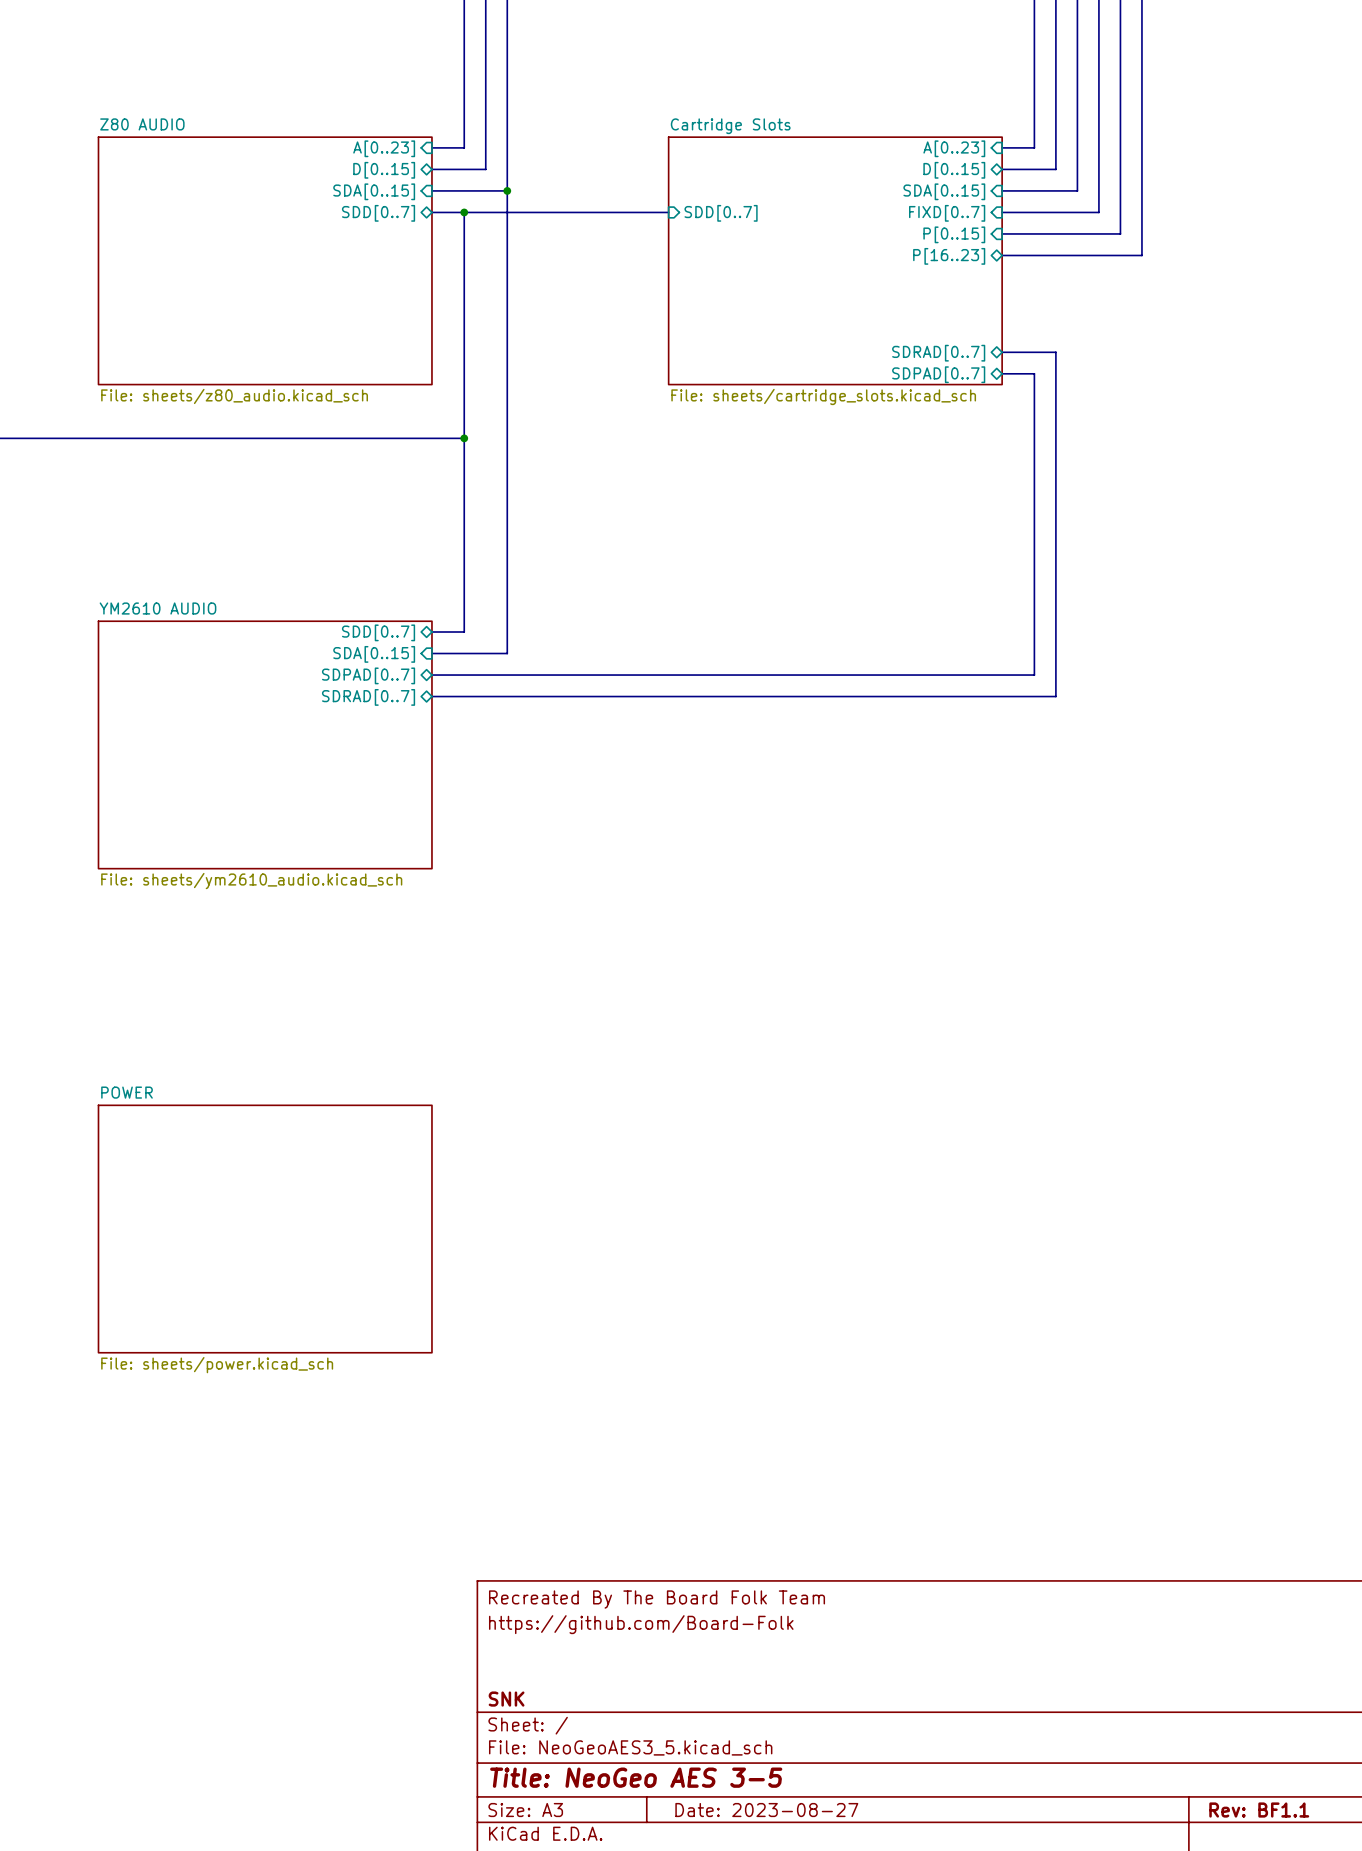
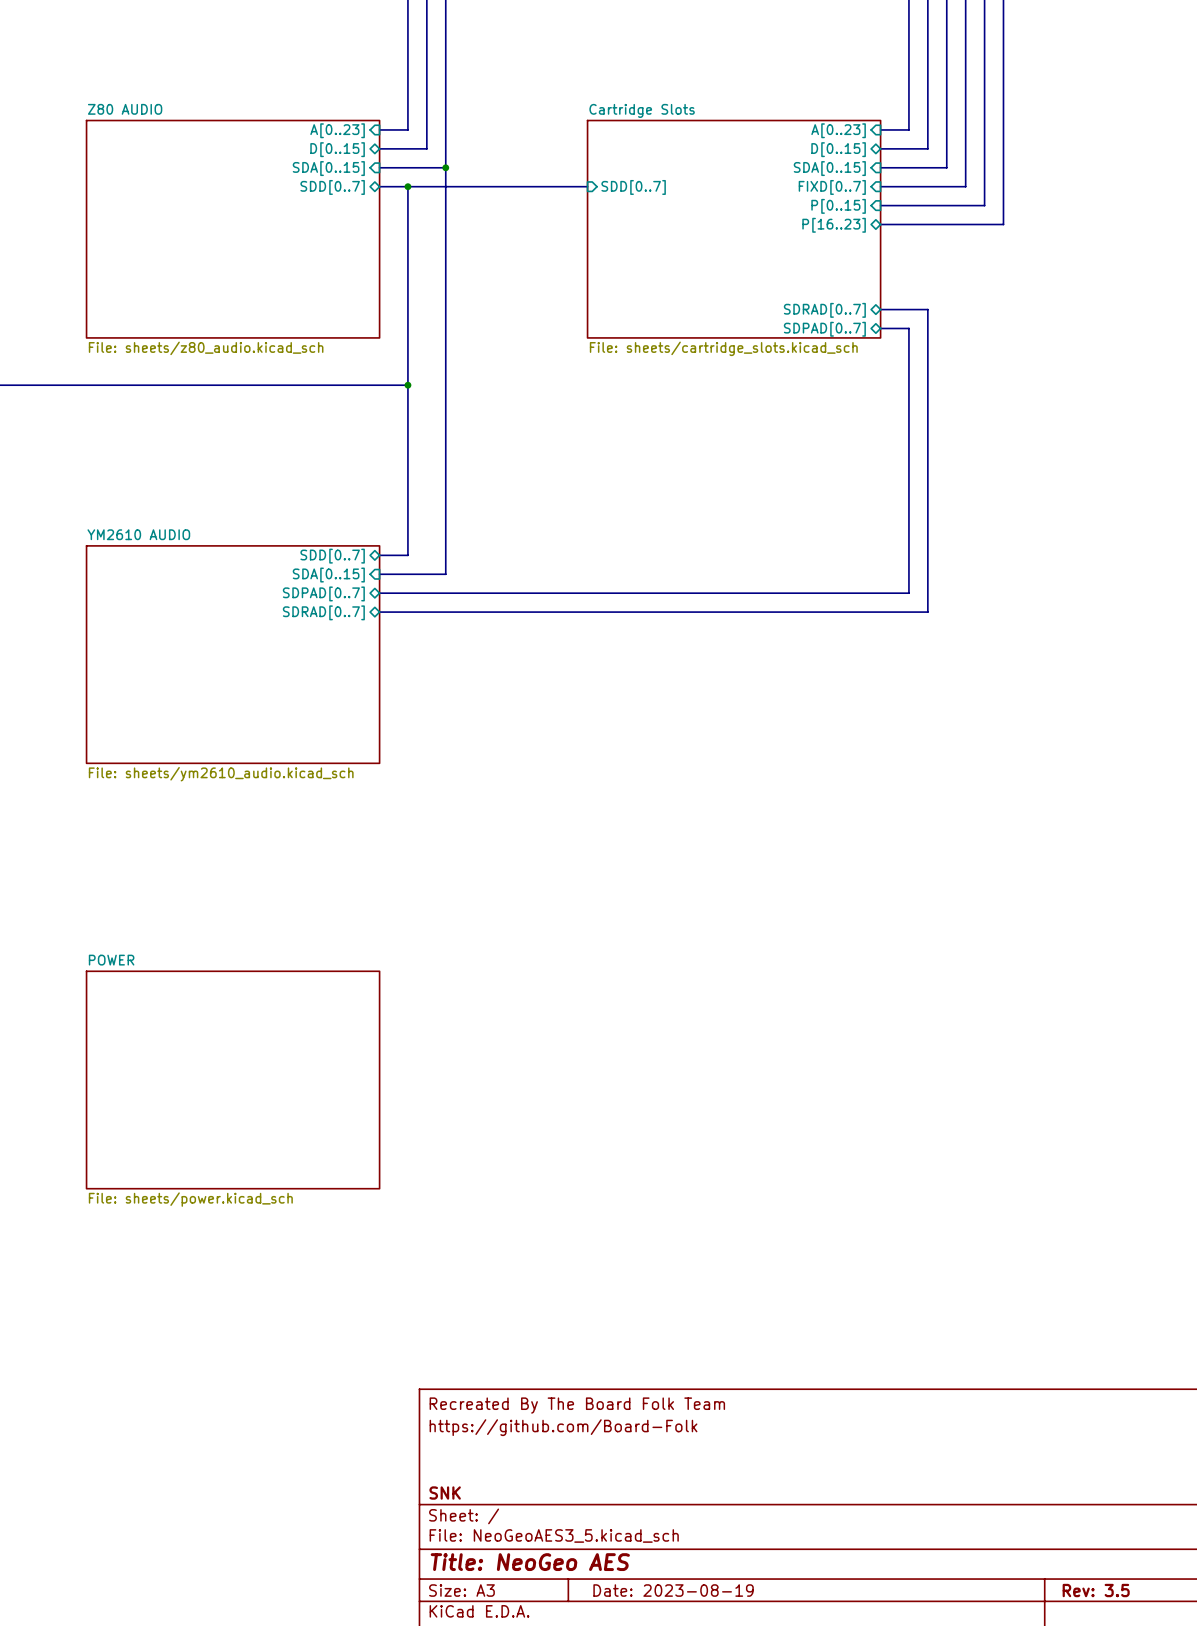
title block: Title: NeoGeo AES 3-5 (636, 1777) -> Title: NeoGeo AES (530, 1562)
title block: Date: 2023-08-27 (766, 1810) -> Date: 2023-08-19 (673, 1590)
title block: Rev: BF1.1 (1259, 1810) -> Rev: 3.5 (1096, 1590)

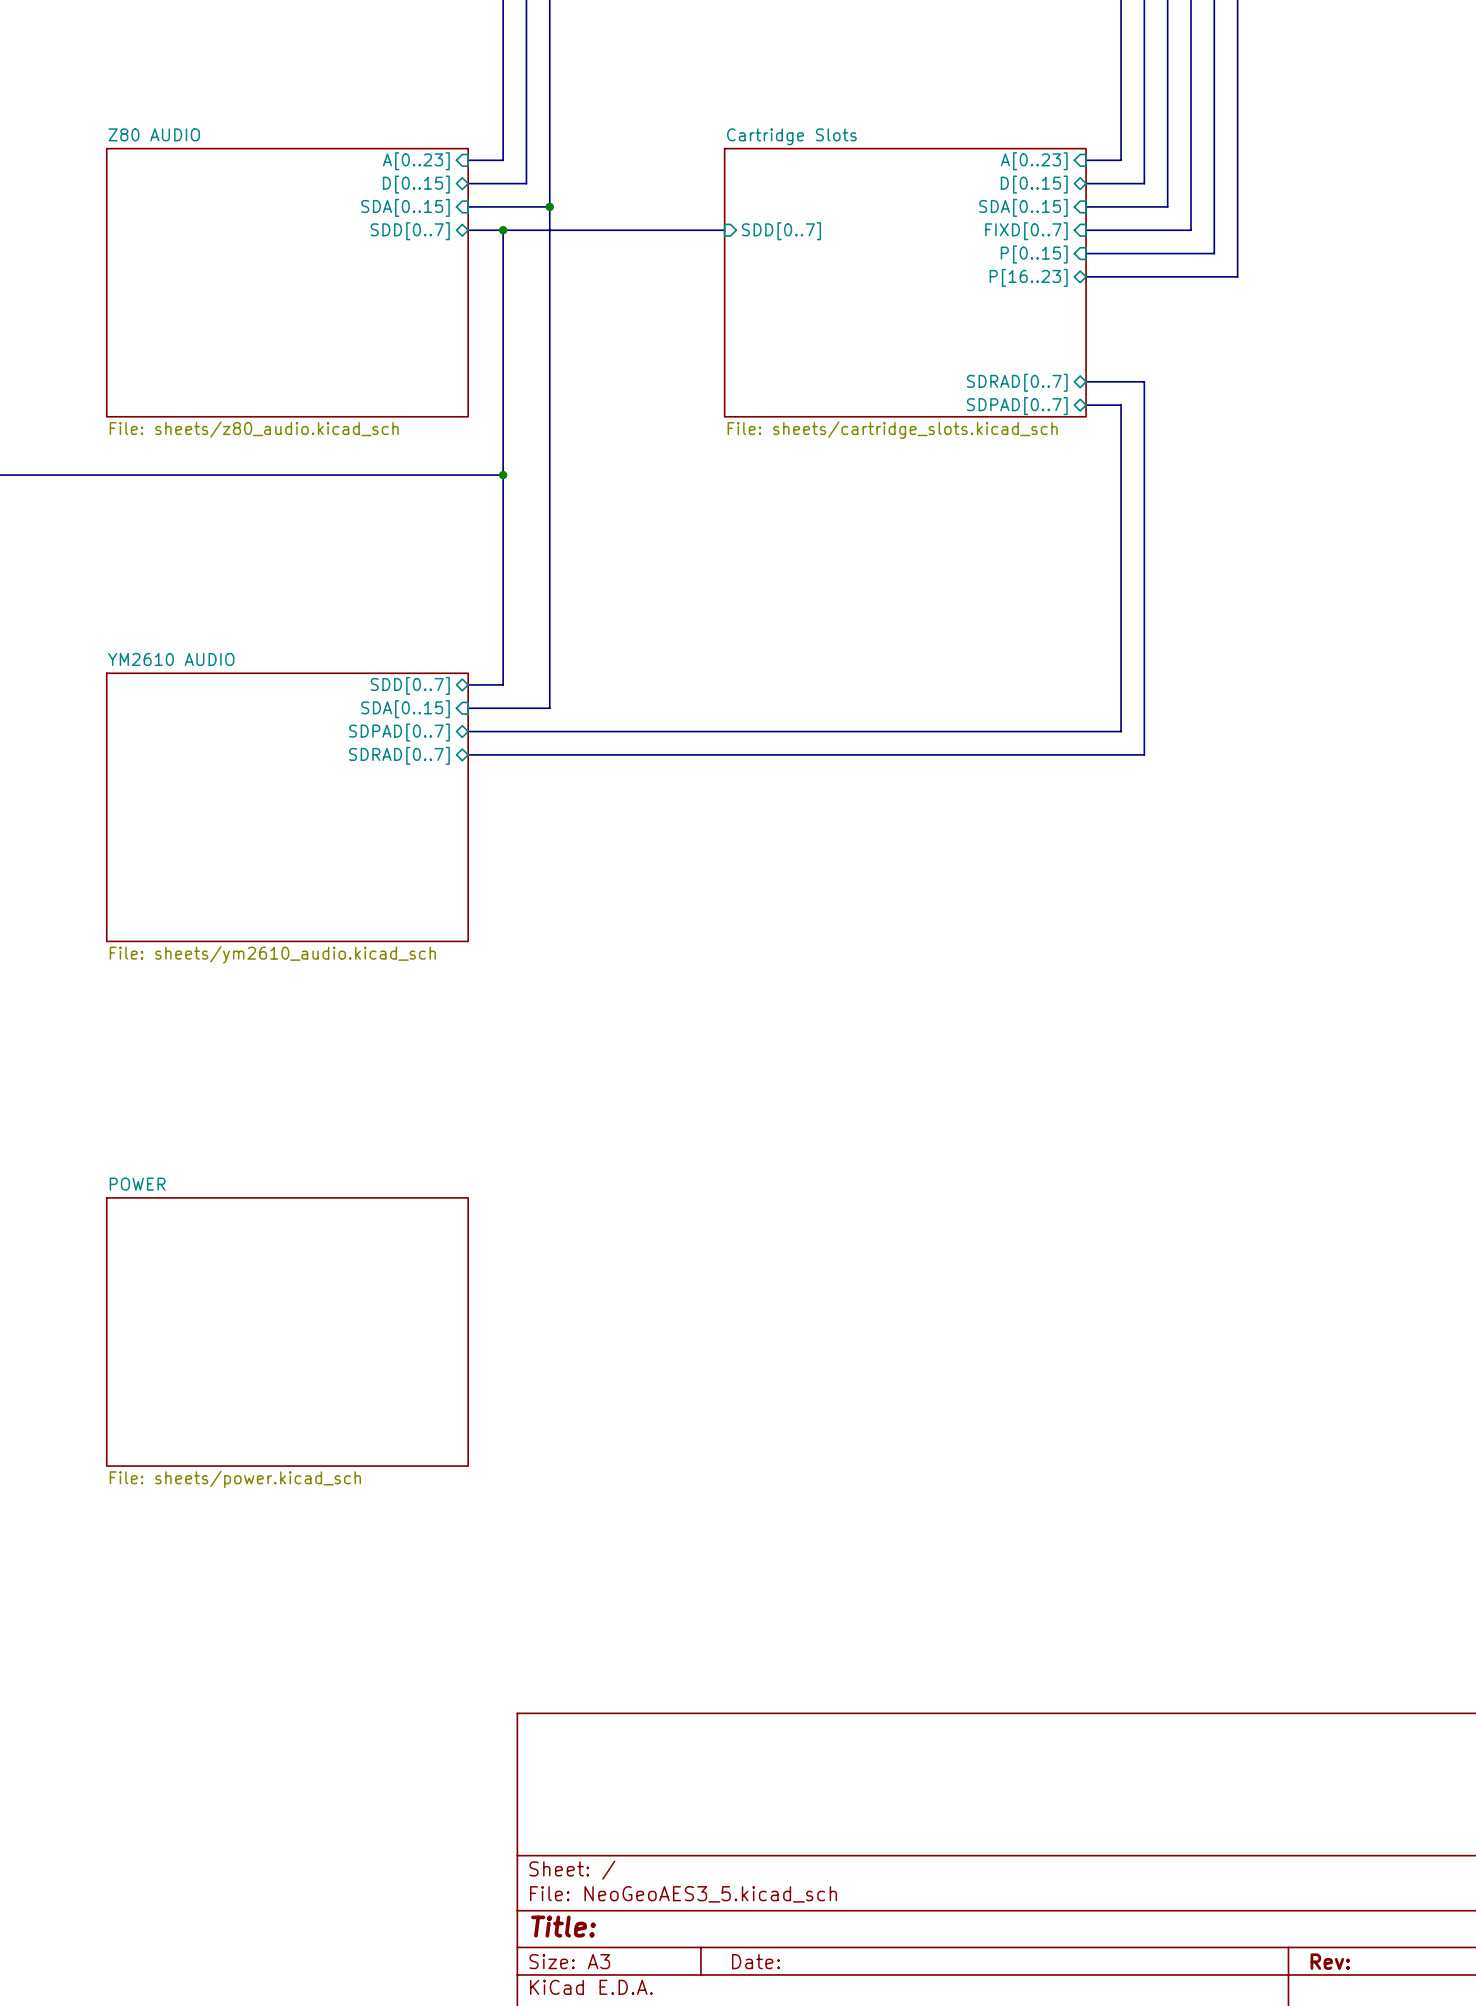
title block: Recreated By The Board Folk Team (577, 1405) -> none
title block: https://github.com/Board-Folk (563, 1427) -> none
title block: SNK (445, 1493) -> none
title block: Title: NeoGeo AES (530, 1562) -> Title: (563, 1926)
title block: Date: 2023-08-19 (673, 1590) -> Date: (755, 1961)
title block: Rev: 3.5 (1096, 1590) -> Rev: (1330, 1961)

